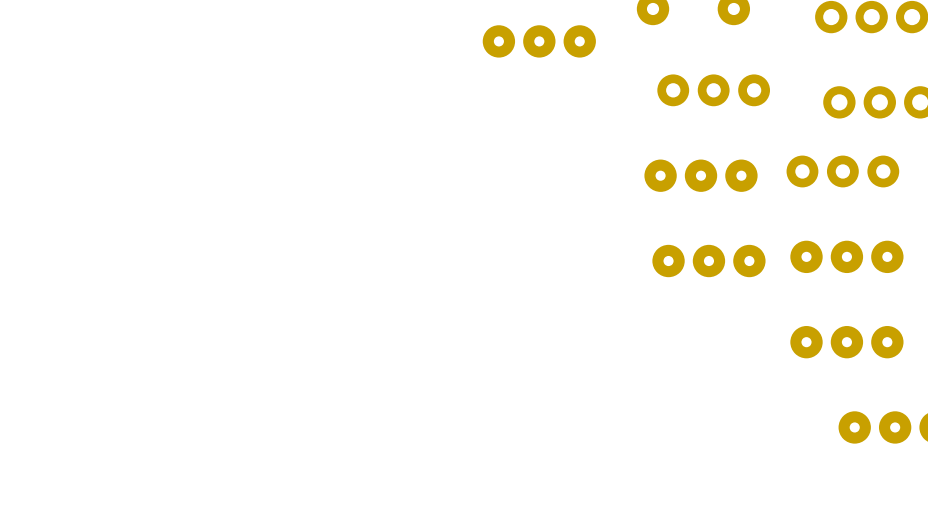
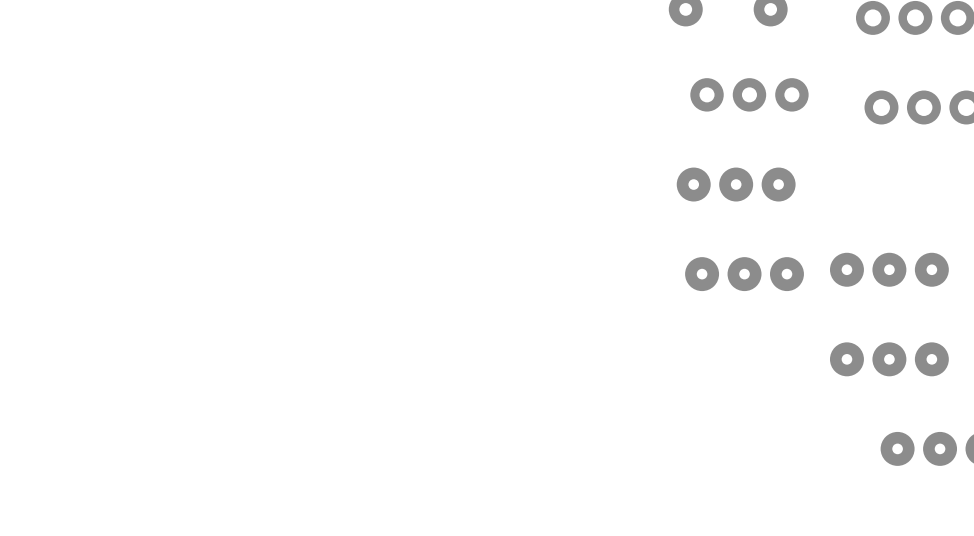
part: (539, 41) -> none
part: (842, 171) -> none

